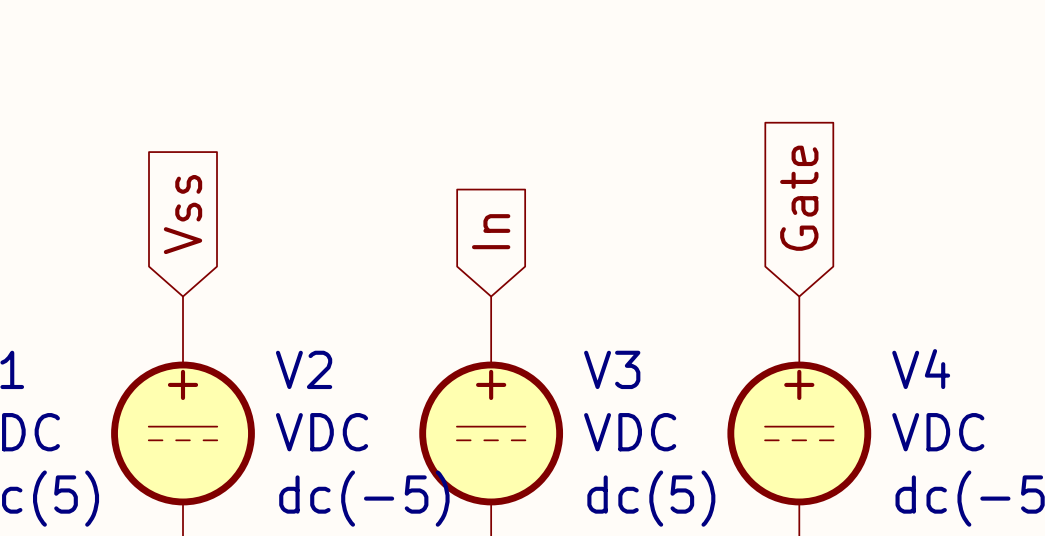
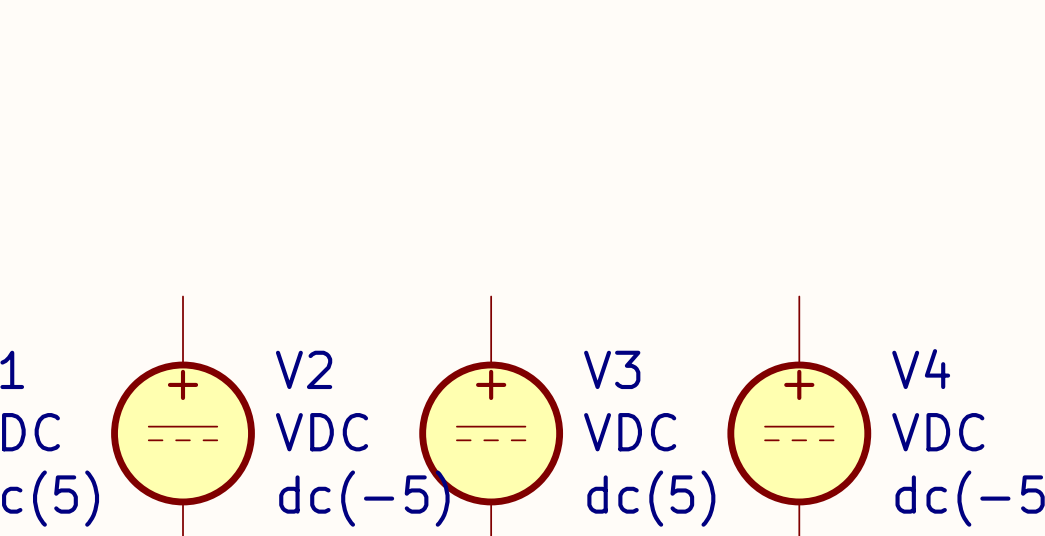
global label: Gate (799, 198) -> none
global label: Vss (183, 214) -> none
global label: In (491, 231) -> none

